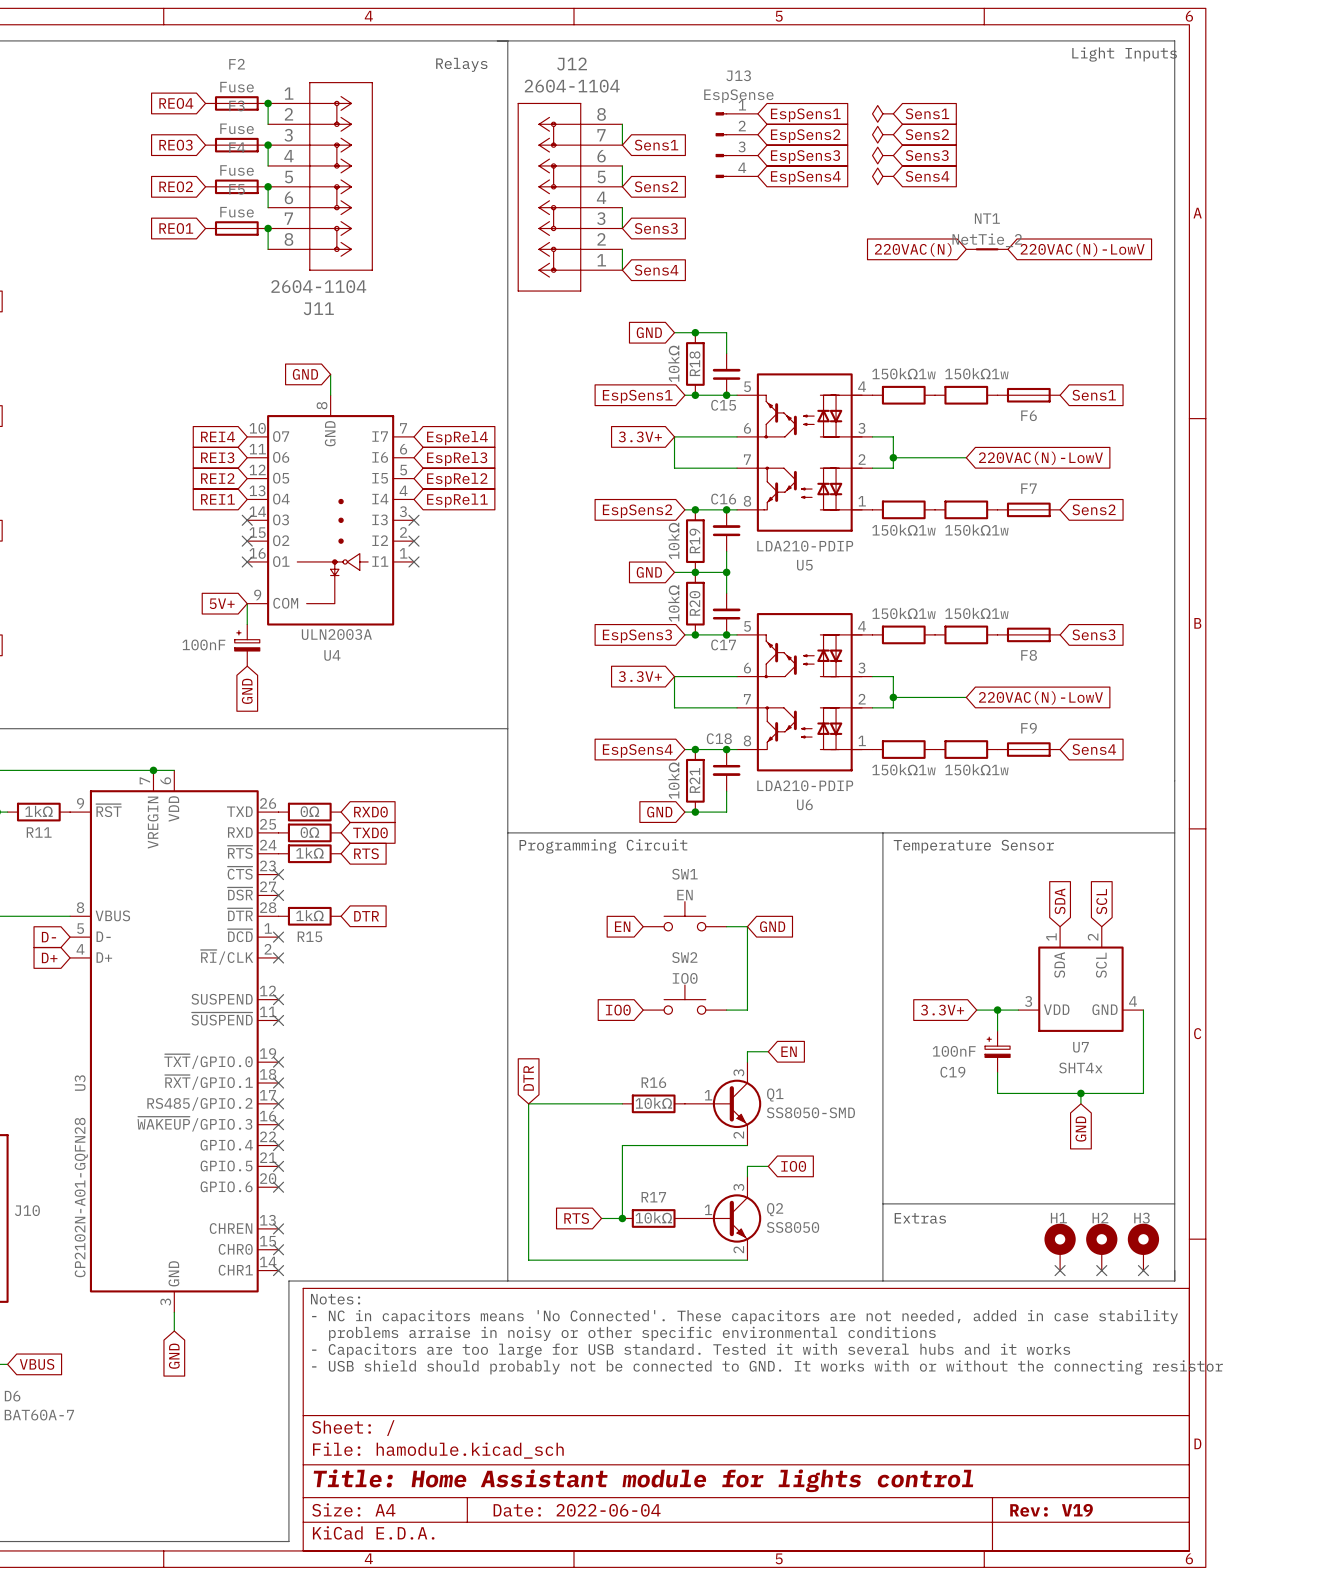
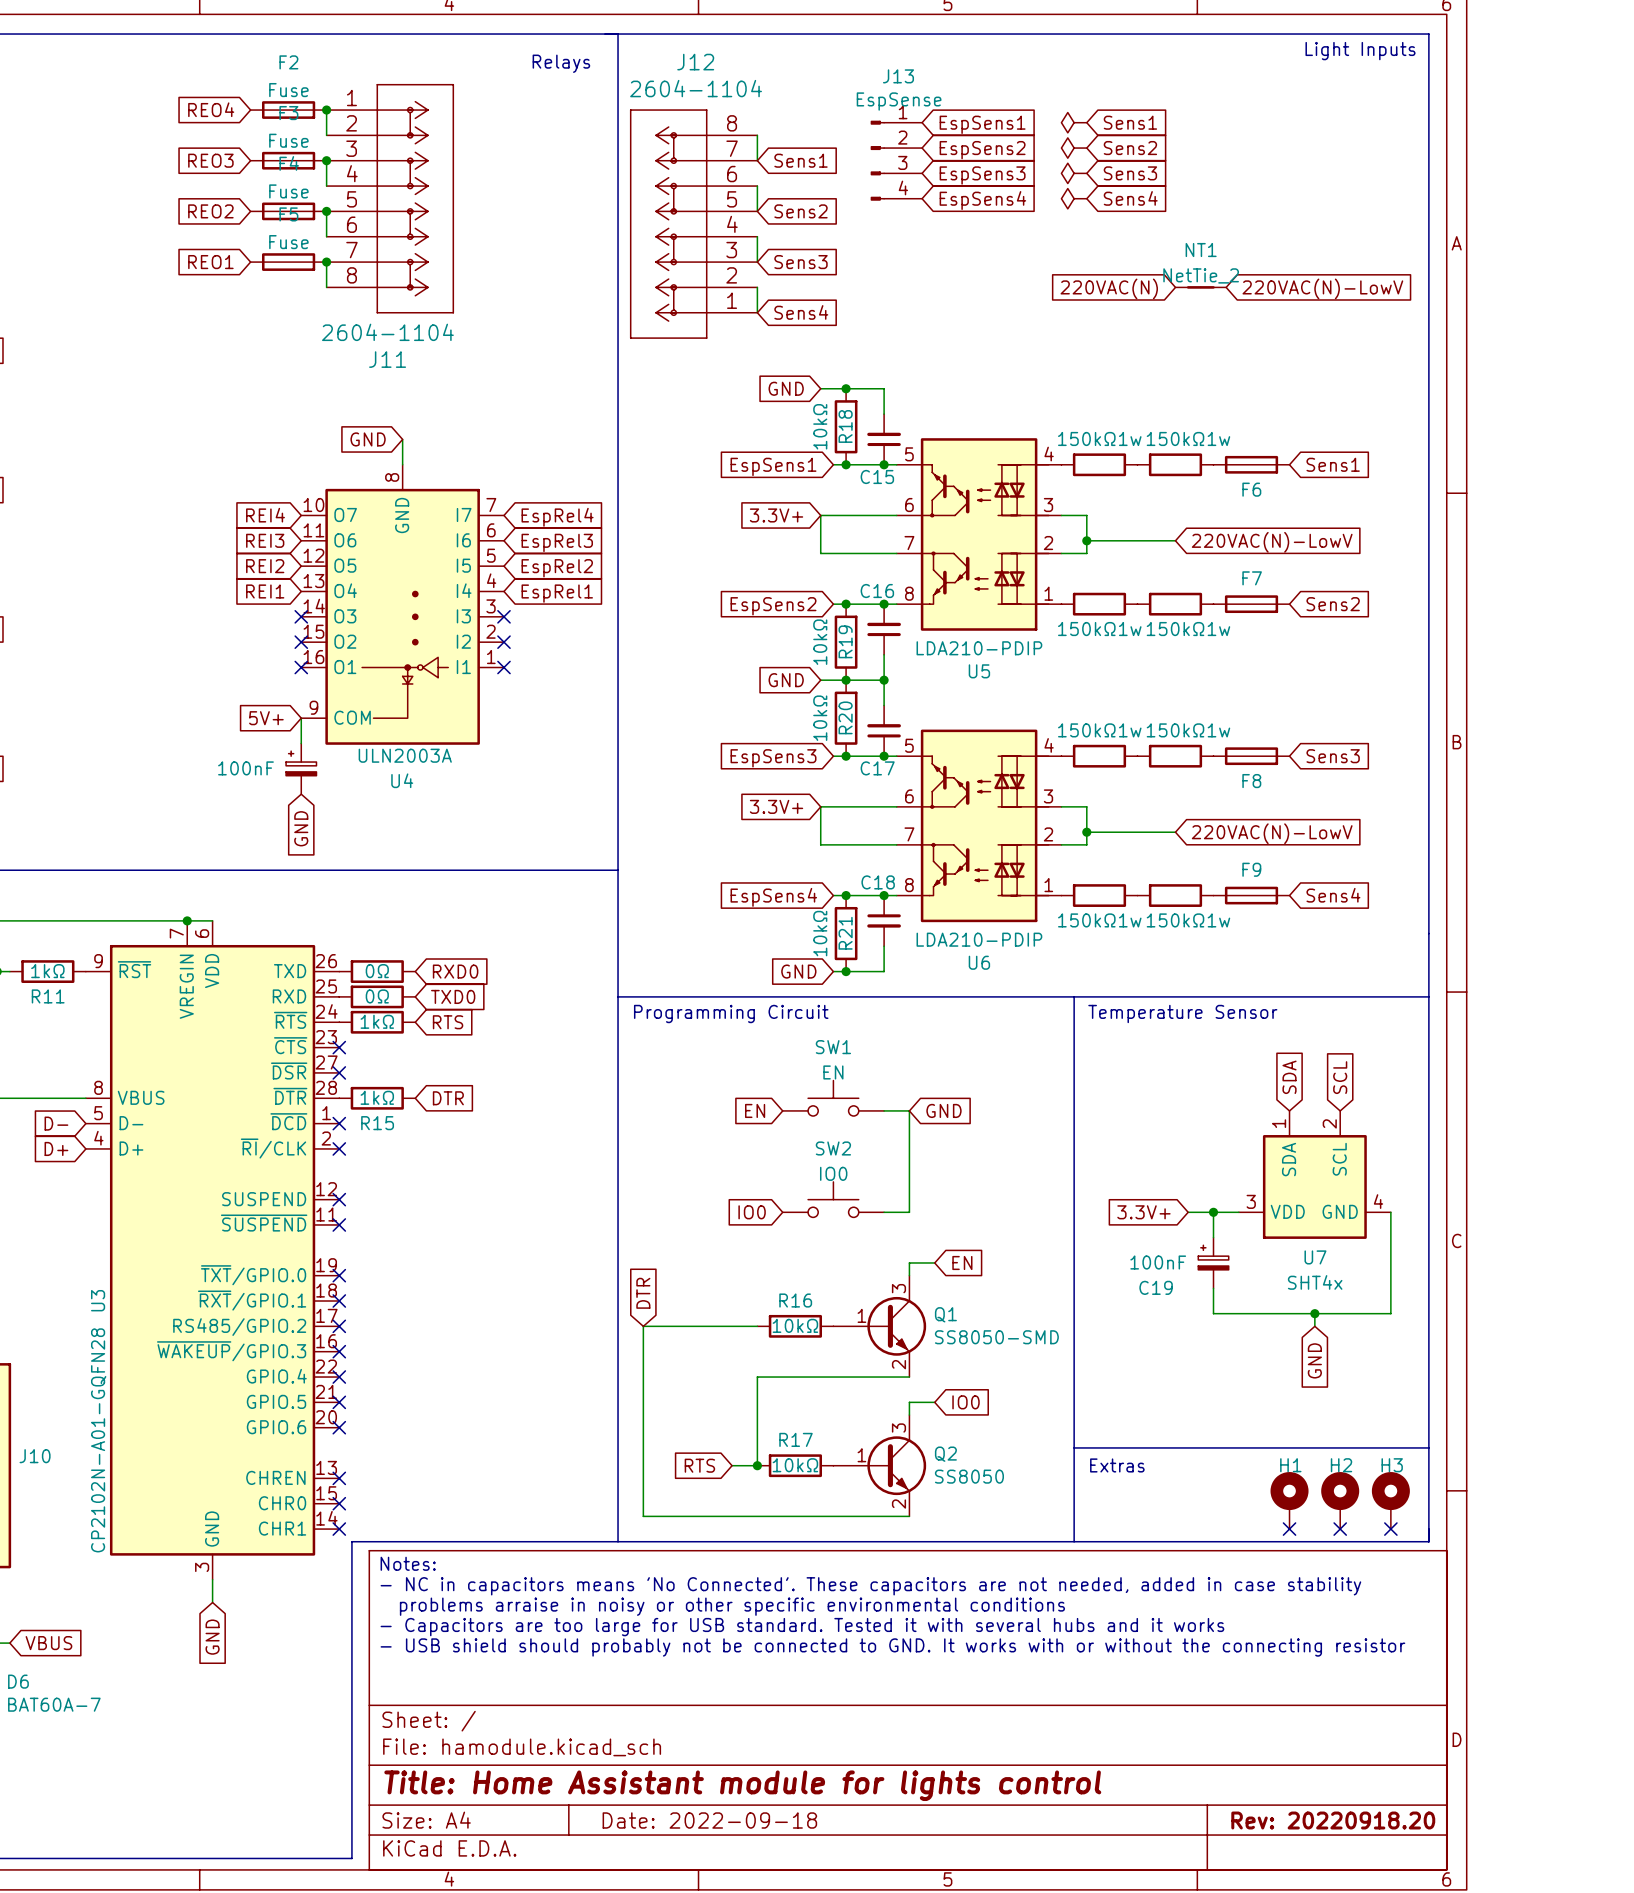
title block: Date: 2022-06-04 (577, 1510) -> Date: 2022-09-18 (709, 1820)
title block: Rev: V19 (1051, 1510) -> Rev: 20220918.20 (1333, 1820)

